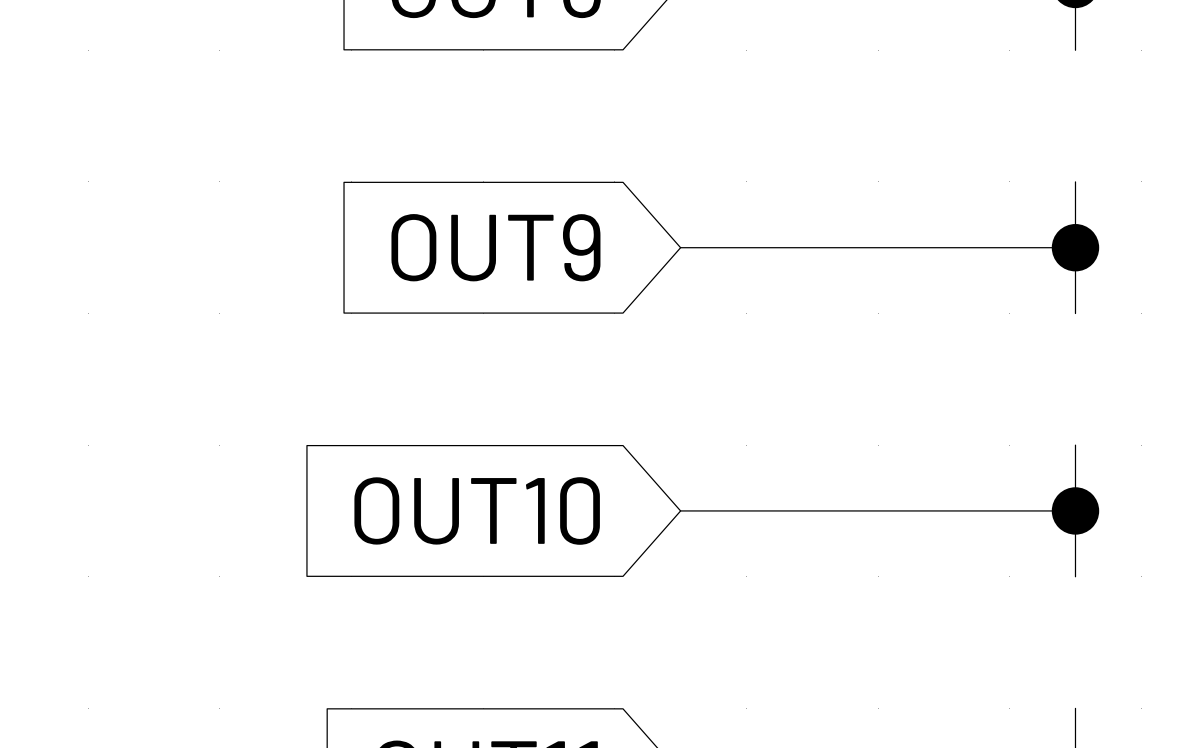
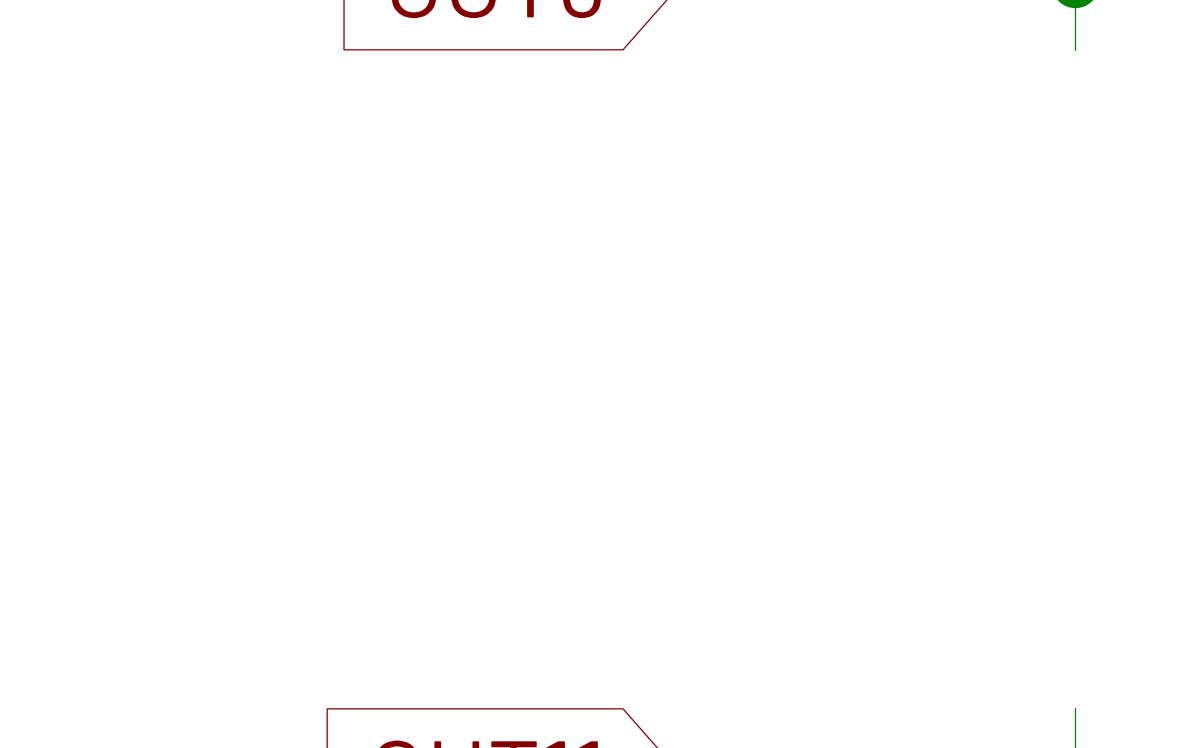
wire: (1075, 181) (1075, 313) -> none
global label: OUT9 (495, 247) -> none
wire: (680, 247) (1075, 247) -> none
junction: (1075, 247) -> none
wire: (1075, 445) (1075, 576) -> none
wire: (680, 510) (1075, 510) -> none
junction: (1075, 510) -> none
global label: OUT10 (477, 511) -> none

